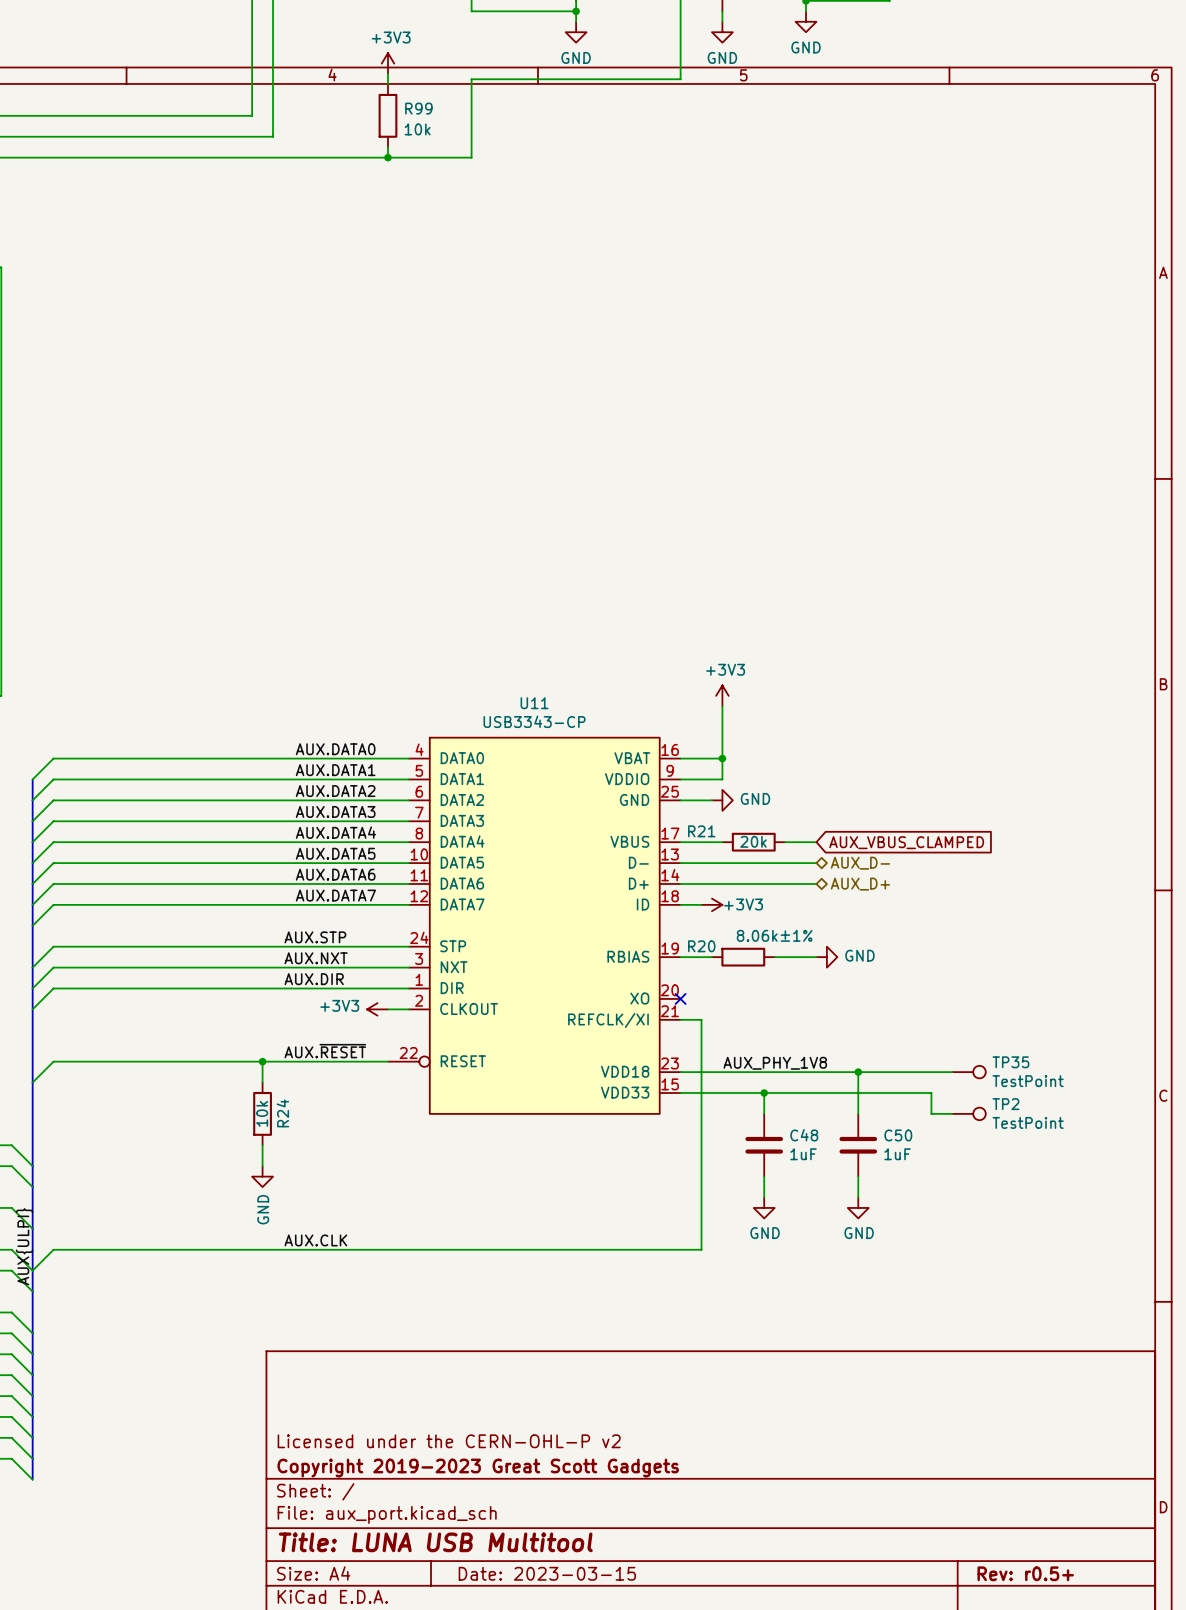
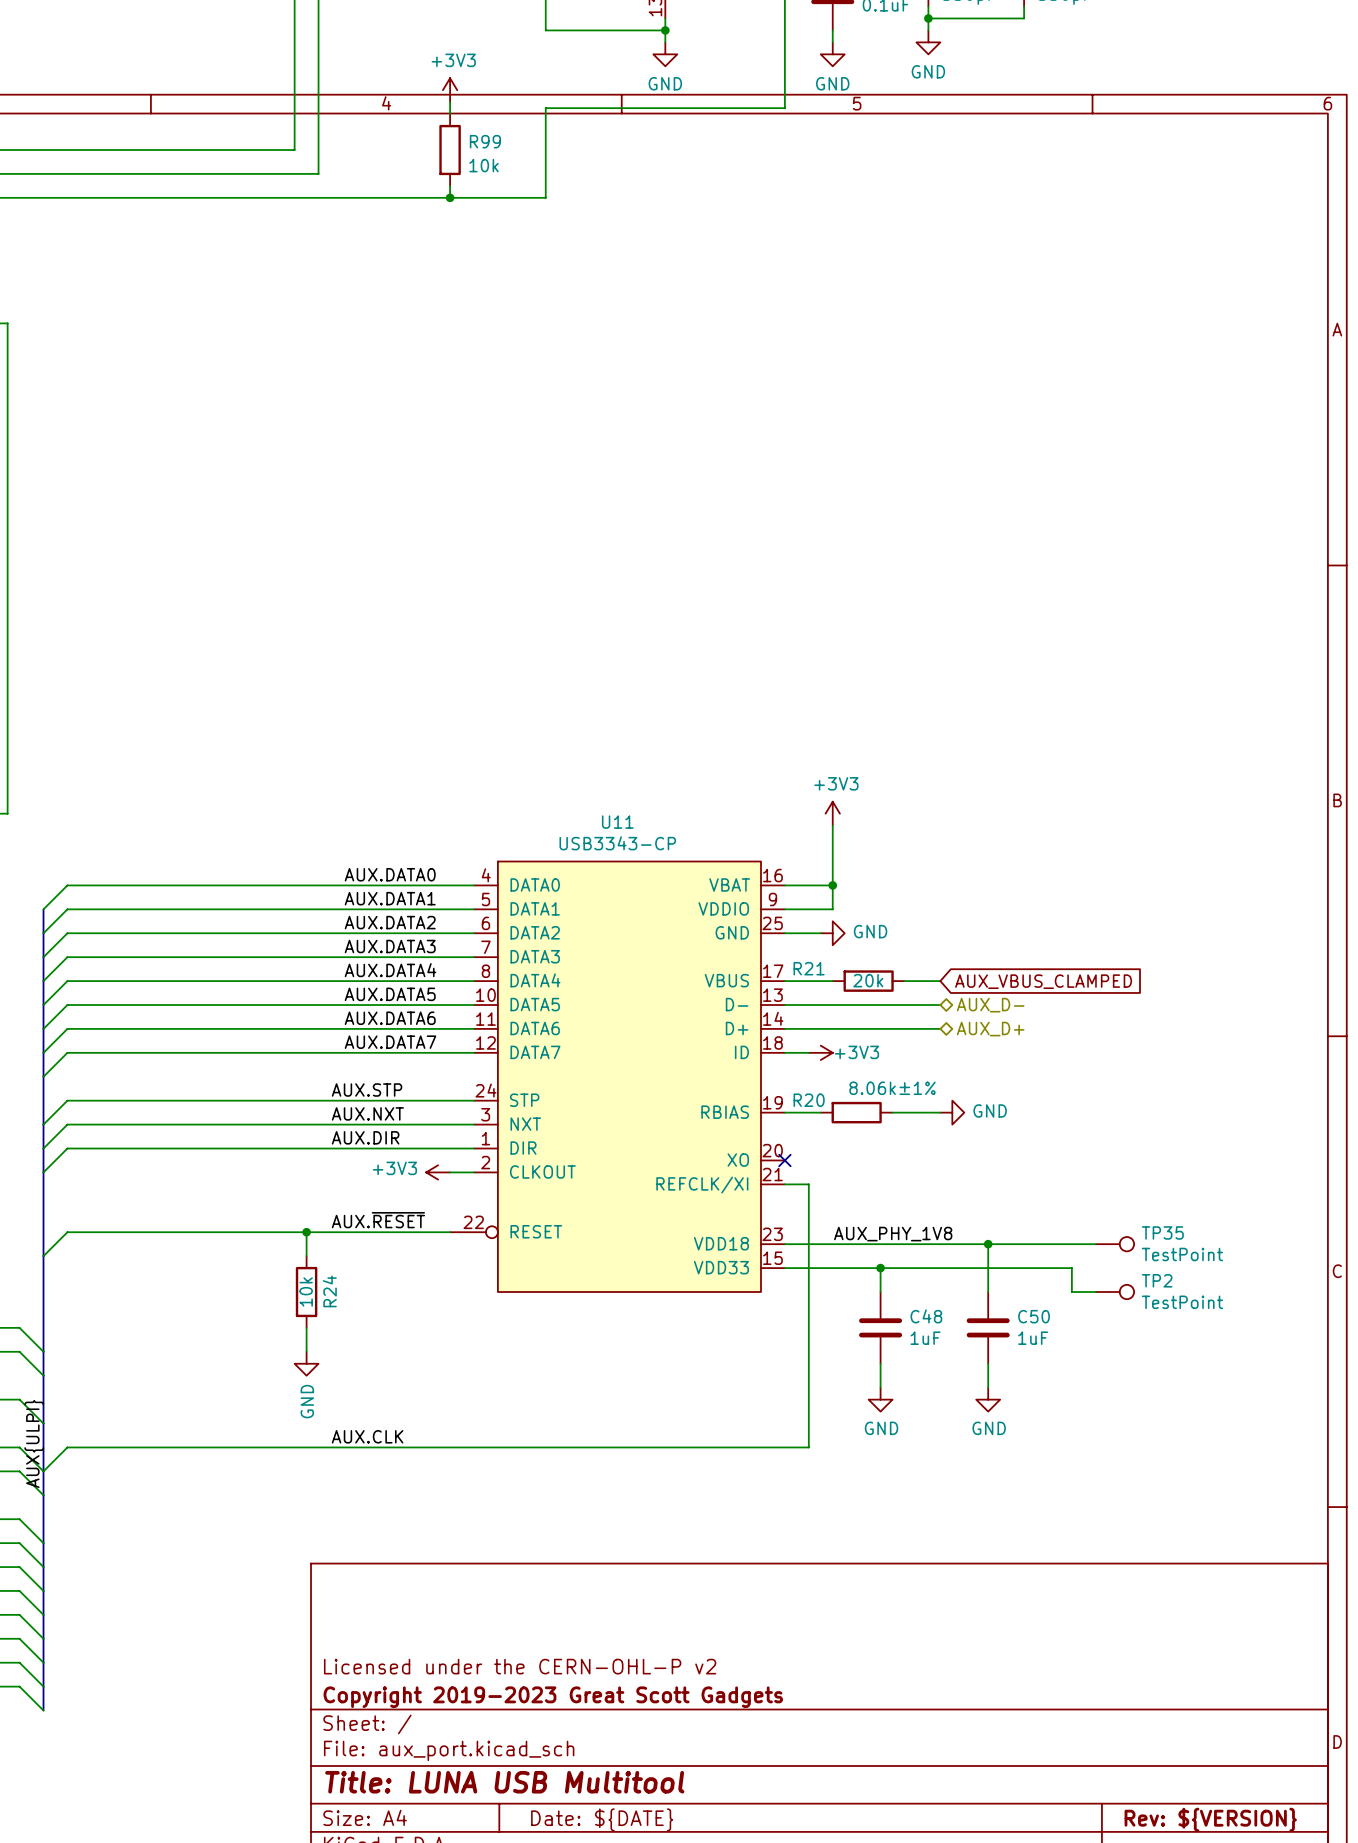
title block: Date: 2023-03-15 (547, 1573) -> Date: ${DATE} (602, 1819)
title block: Rev: r0.5+ (1025, 1573) -> Rev: ${VERSION} (1210, 1819)

